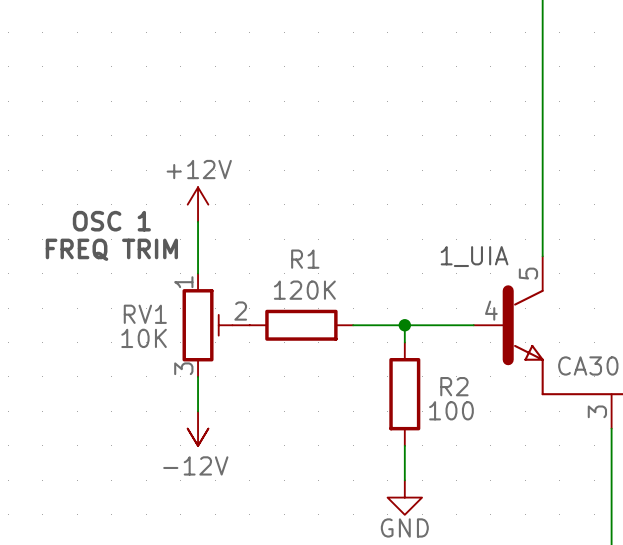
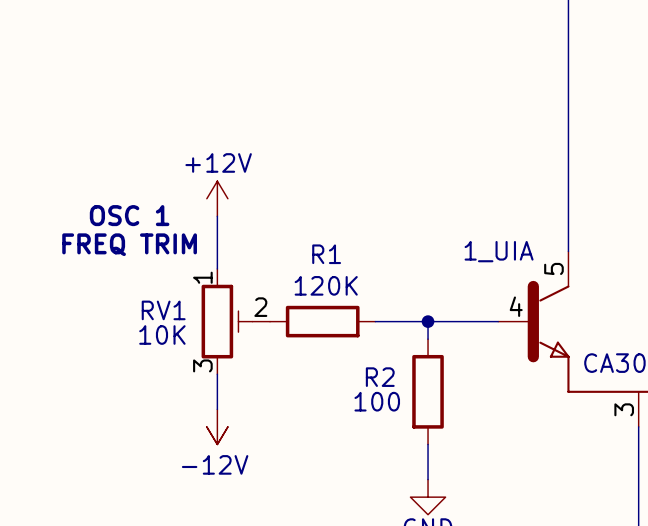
R2 name position: R2 (454, 386) -> R2 (380, 377)
R2 value position: 100 (451, 410) -> 100 (377, 401)

